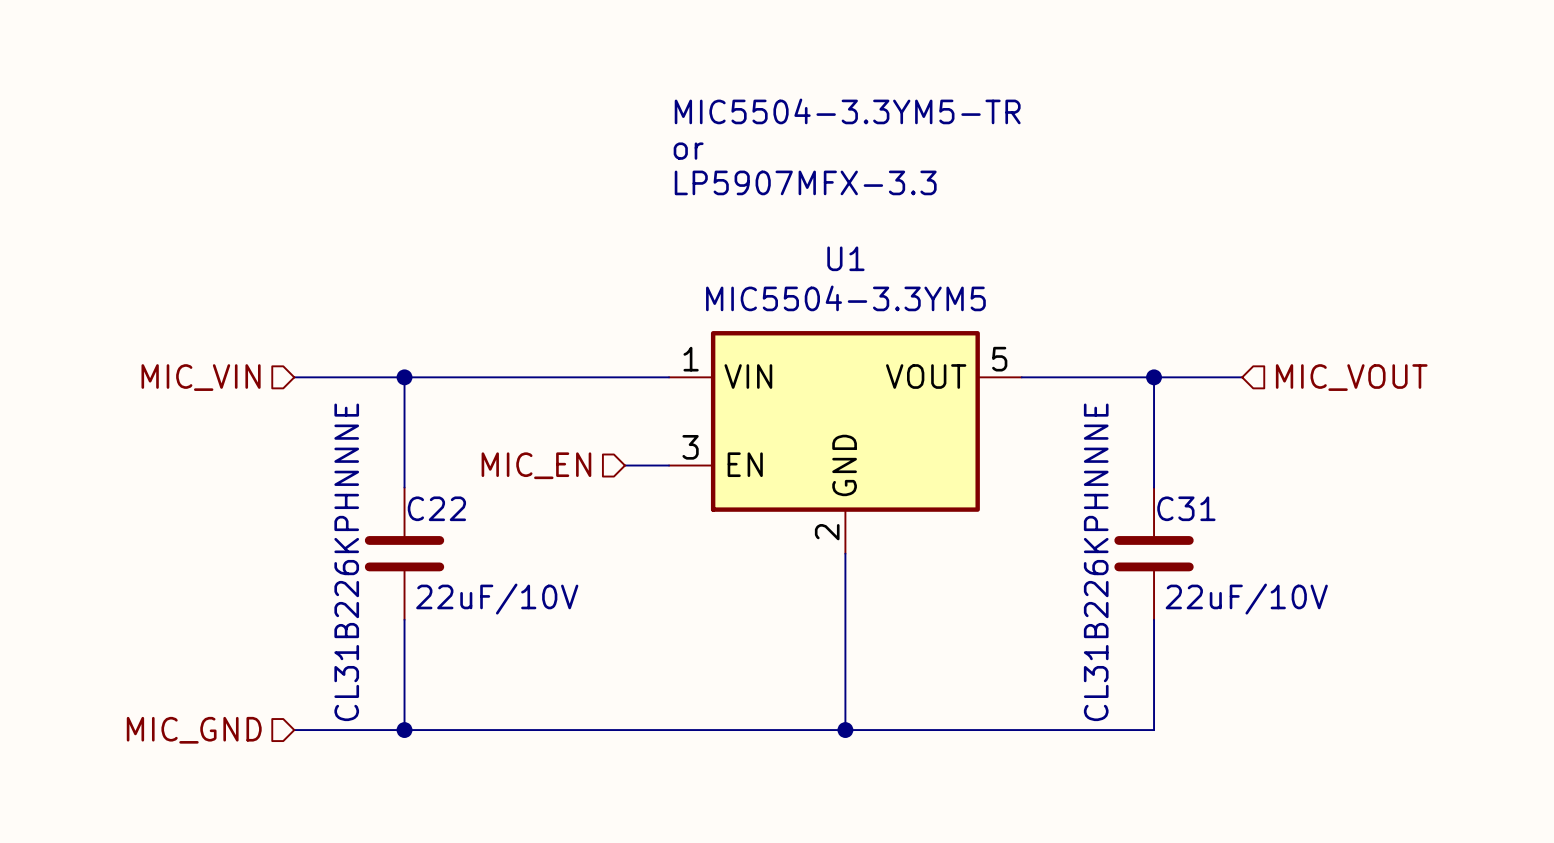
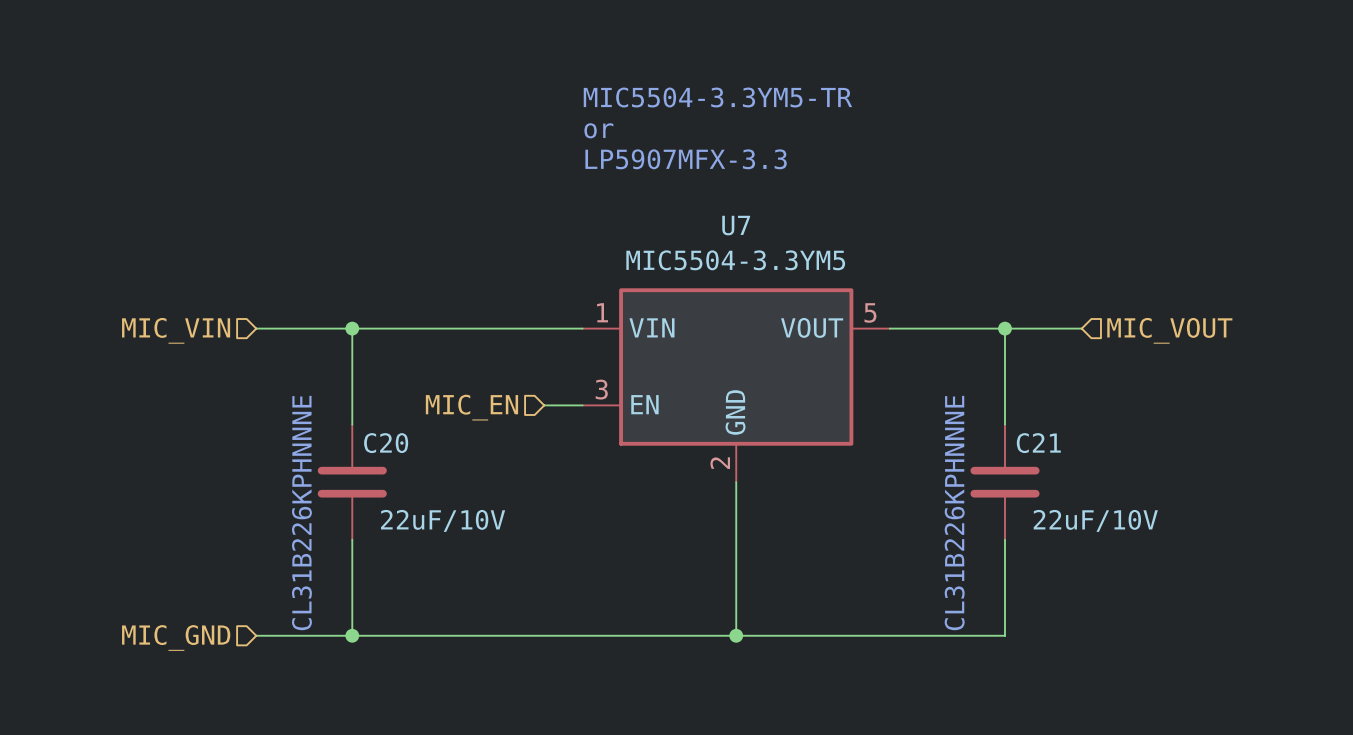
U1 name: U1 (845, 258) -> U7 (736, 225)
C22 name: C22 (436, 508) -> C20 (386, 443)
C31 name: C31 (1186, 508) -> C21 (1038, 443)

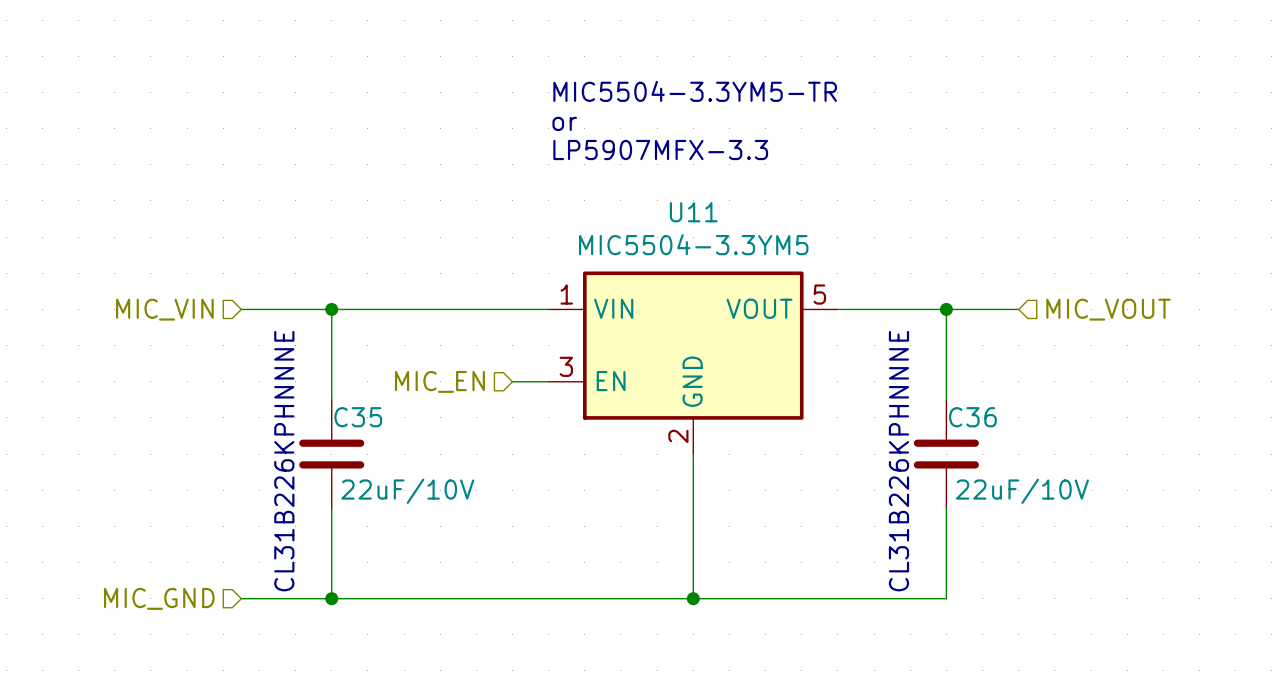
U7 name: U7 (736, 225) -> U11 (693, 212)
C20 name: C20 (386, 443) -> C35 (358, 417)
C21 name: C21 (1038, 443) -> C36 (972, 417)

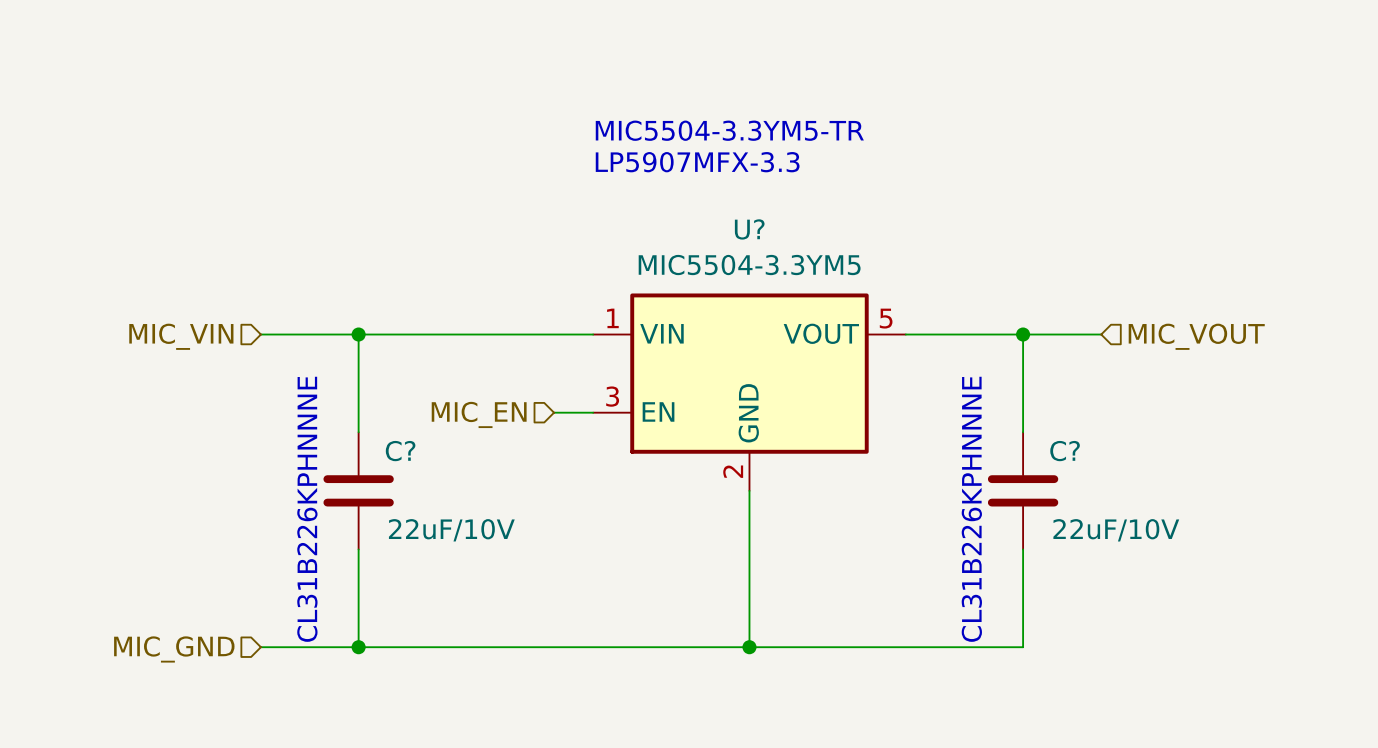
text: MIC5504-3.3YM5-TR (695, 91) -> none
text: or (564, 123) -> MIC5504-3.3YM5-TR (729, 130)
U11 name: U11 (693, 212) -> U? (749, 229)
C35 name: C35 (358, 417) -> C? (400, 451)
C36 name: C36 (972, 417) -> C? (1065, 451)

